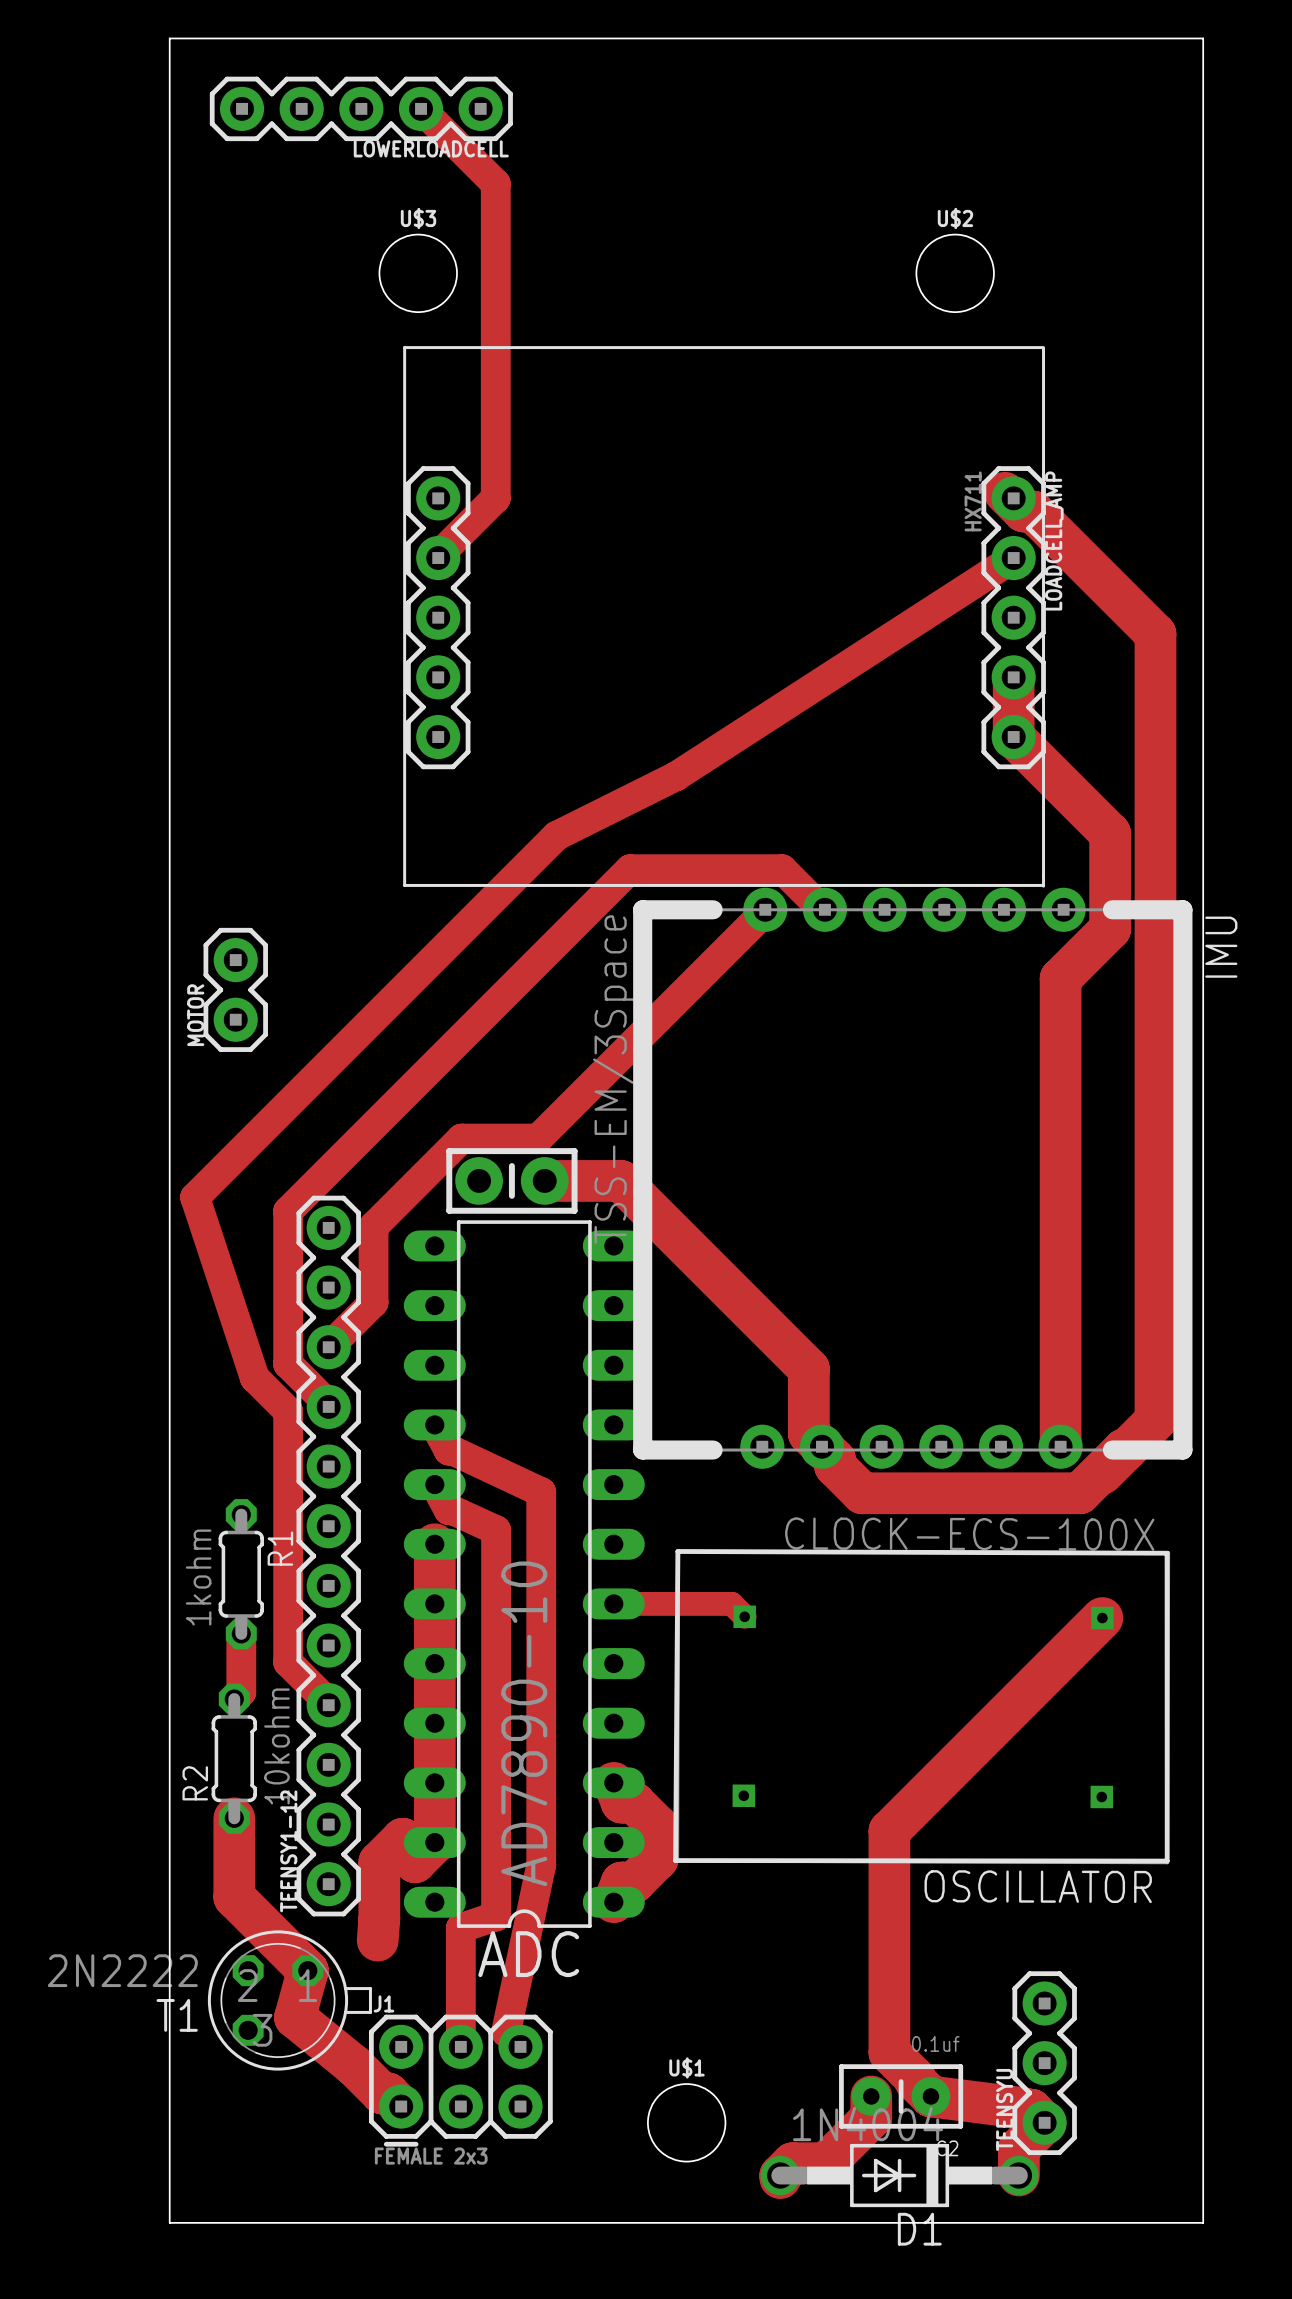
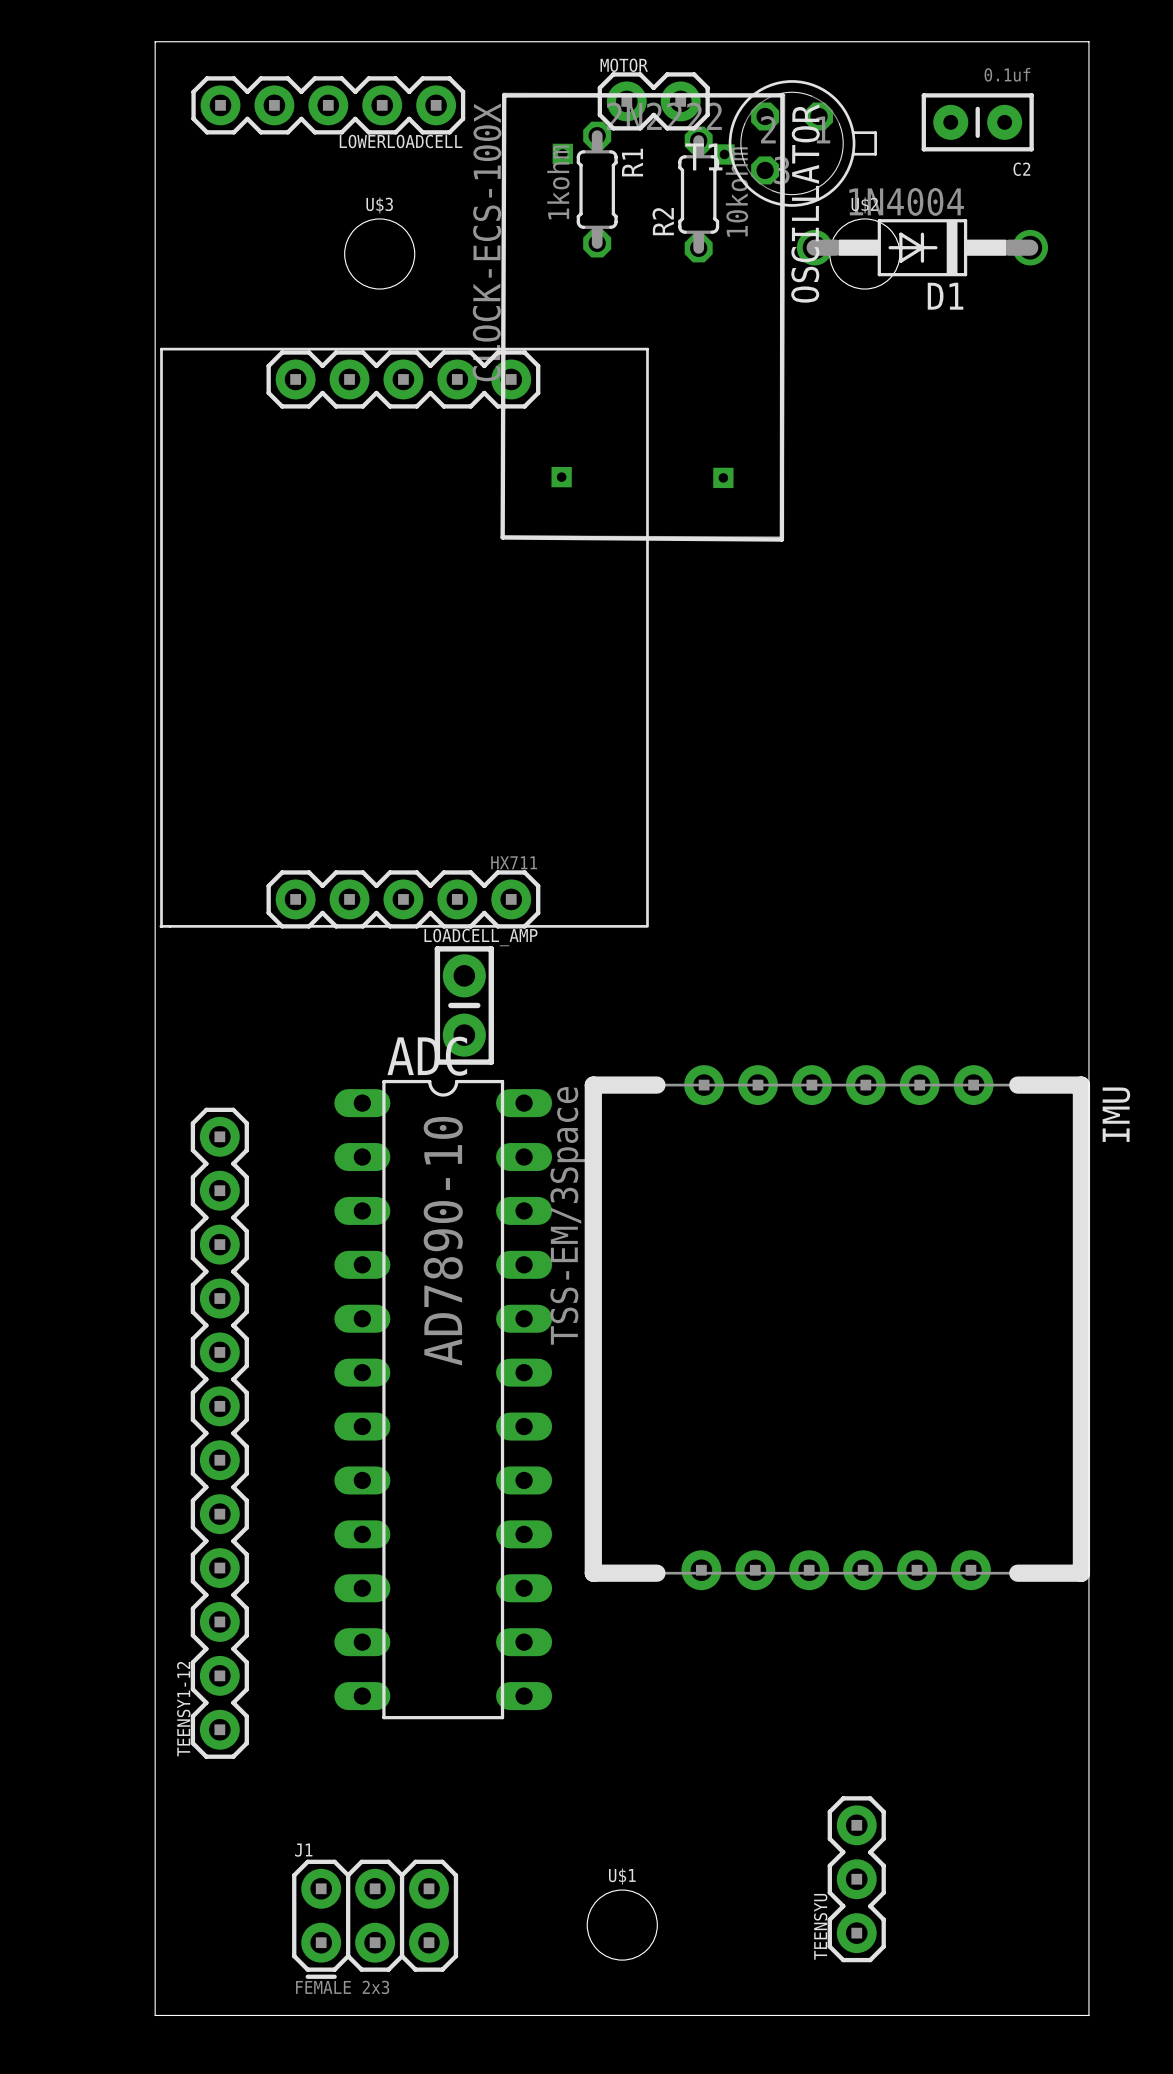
MOTOR: none -> (653, 101)
track: (421, 108) (495, 183) (495, 498) (438, 555) (438, 558) -> none
OSCILLATOR: none -> CLOCK-ECS-100X (642, 317)
track: (1004, 492) (1023, 511) (1032, 511) (1155, 634) (1155, 1420) (1102, 1473) -> none
track: (1013, 558) (676, 776) (556, 835) (195, 1197) (254, 1377) (288, 1411) (288, 1662) (328, 1702) (328, 1705) -> none
LOADCELL_AMP rotation: 0° (724, 616) -> 90° clockwise (404, 638)
track: (1013, 677) (1013, 737) (1110, 833) (1110, 929) (1060, 978) (1060, 1446) -> none
track: (766, 910) (538, 1138) (461, 1138) (373, 1226) (373, 1302) (328, 1347) -> none
track: (825, 910) (823, 910) (782, 869) (630, 869) (288, 1211) (288, 1364) (328, 1404) (328, 1406) -> none
MOTOR: (235, 989) -> none
IMU position: (912, 1178) -> (837, 1327)
part rotation: 0° (511, 1180) -> 90° clockwise (464, 1005)
track: (544, 1180) (620, 1180) (808, 1368) (808, 1433) (835, 1459) (835, 1466) (862, 1493) (1079, 1493) (1123, 1449) (1126, 1449) -> none
track: (434, 1424) (448, 1450) (452, 1450) (541, 1492) (541, 1864) (506, 2032) -> none
track: (434, 1484) (448, 1510) (452, 1510) (496, 1530) (496, 1916) (460, 1928) (460, 2046) -> none
track: (434, 1544) (434, 1842) (415, 1862) (402, 1838) (379, 1862) (377, 1940) -> none
TEENSY1-12 position: (328, 1556) -> (219, 1433)
R1 position: (241, 1574) -> (597, 189)
ADC rotation: 0° (524, 1574) -> 180° (443, 1399)
track: (613, 1603) (731, 1603) (744, 1616) -> none
track: (1102, 1618) (889, 1831) (889, 2052) (930, 2096) (1031, 2109) (1044, 2122) (1018, 2148) (1018, 2175) -> none
track: (241, 1633) (241, 1692) (234, 1699) -> none
OSCILLATOR: CLOCK-ECS-100X (921, 1706) -> none
R2 position: (234, 1758) -> (698, 194)
track: (613, 1782) (621, 1802) (634, 1802) (657, 1826) (657, 1859) (634, 1882) (621, 1882) (613, 1902) -> none
track: (234, 1818) (234, 1897) (307, 1970) (295, 2017) (354, 2066) (381, 2093) (388, 2093) (401, 2106) -> none
T1 position: (289, 2000) -> (802, 143)
TEENSYU position: (1044, 2063) -> (856, 1879)
J1 position: (460, 2080) -> (375, 1919)
track: (871, 2096) (871, 2117) (825, 2163) (792, 2163) (780, 2175) (780, 2178) -> none
C2 position: (901, 2096) -> (977, 122)
D1 position: (899, 2175) -> (922, 247)

